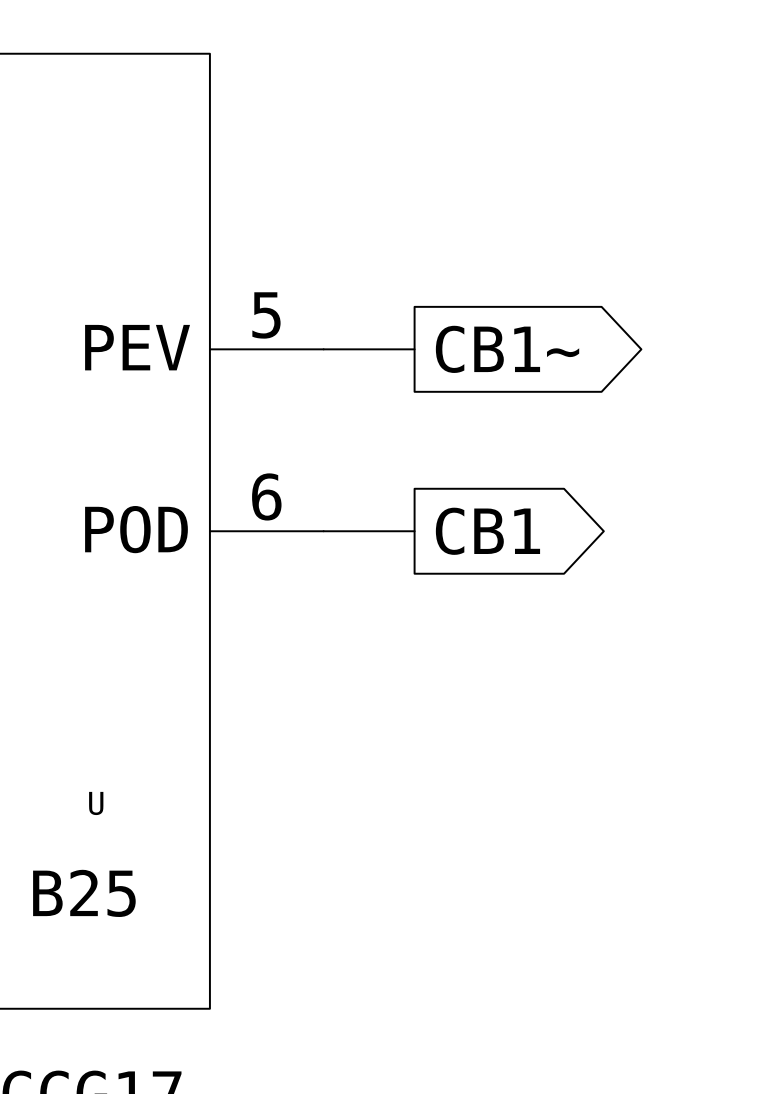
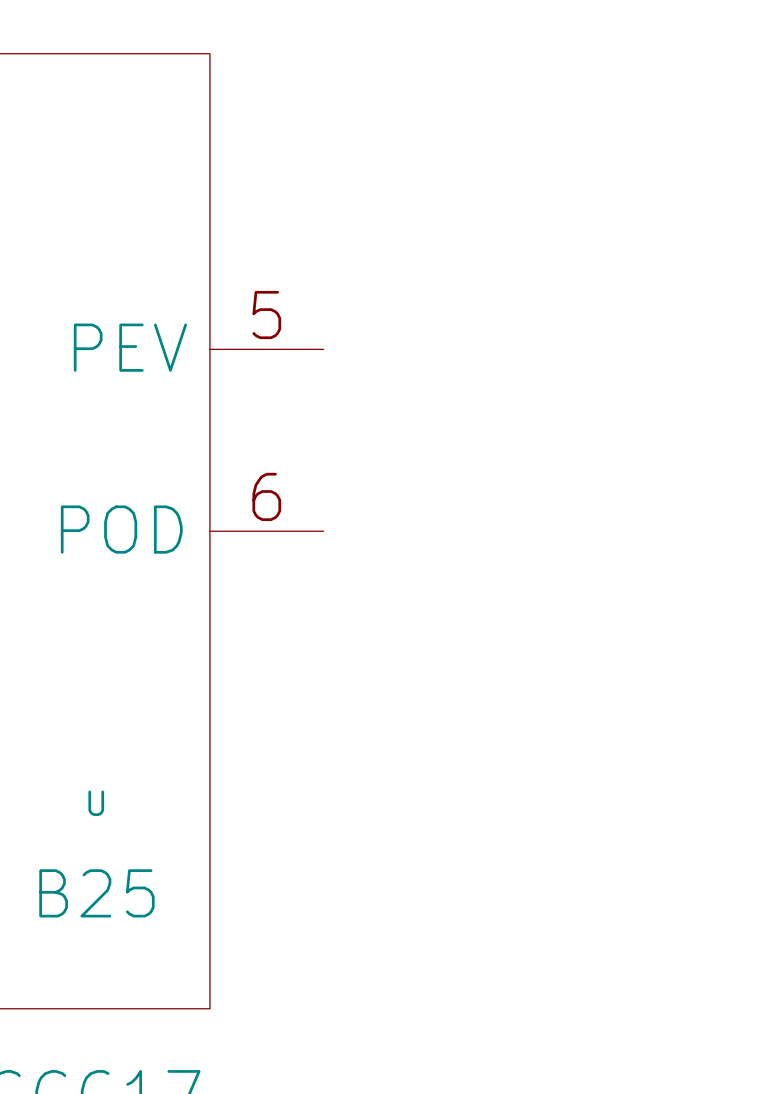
wire: (323, 349) (414, 349) -> none
global label: CB1~ (507, 349) -> none
wire: (323, 531) (414, 531) -> none
global label: CB1 (487, 531) -> none

